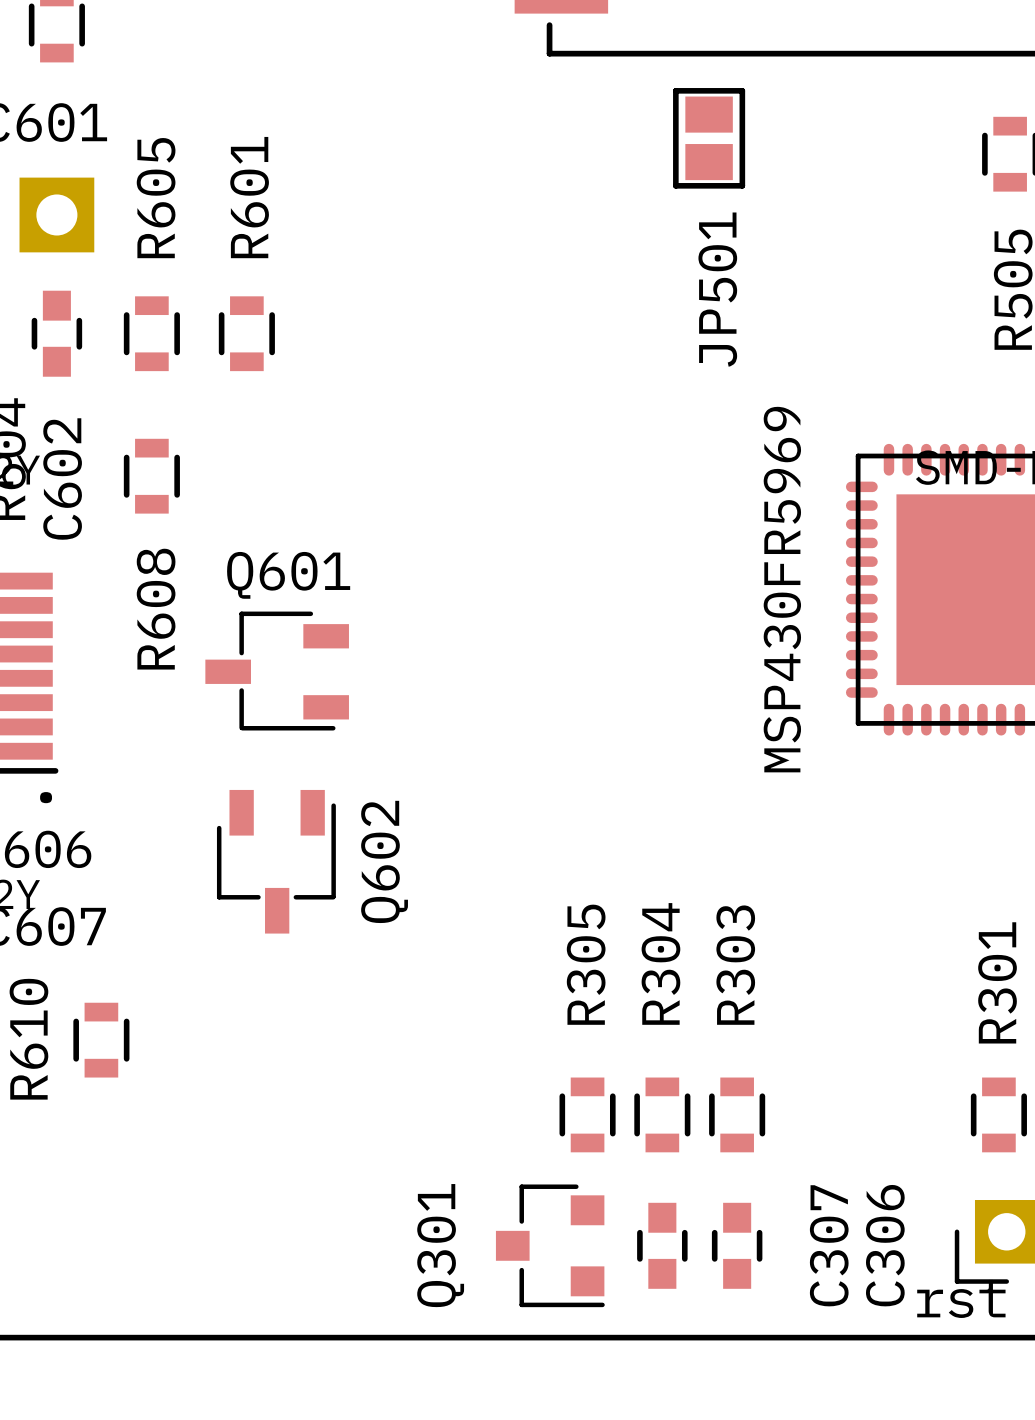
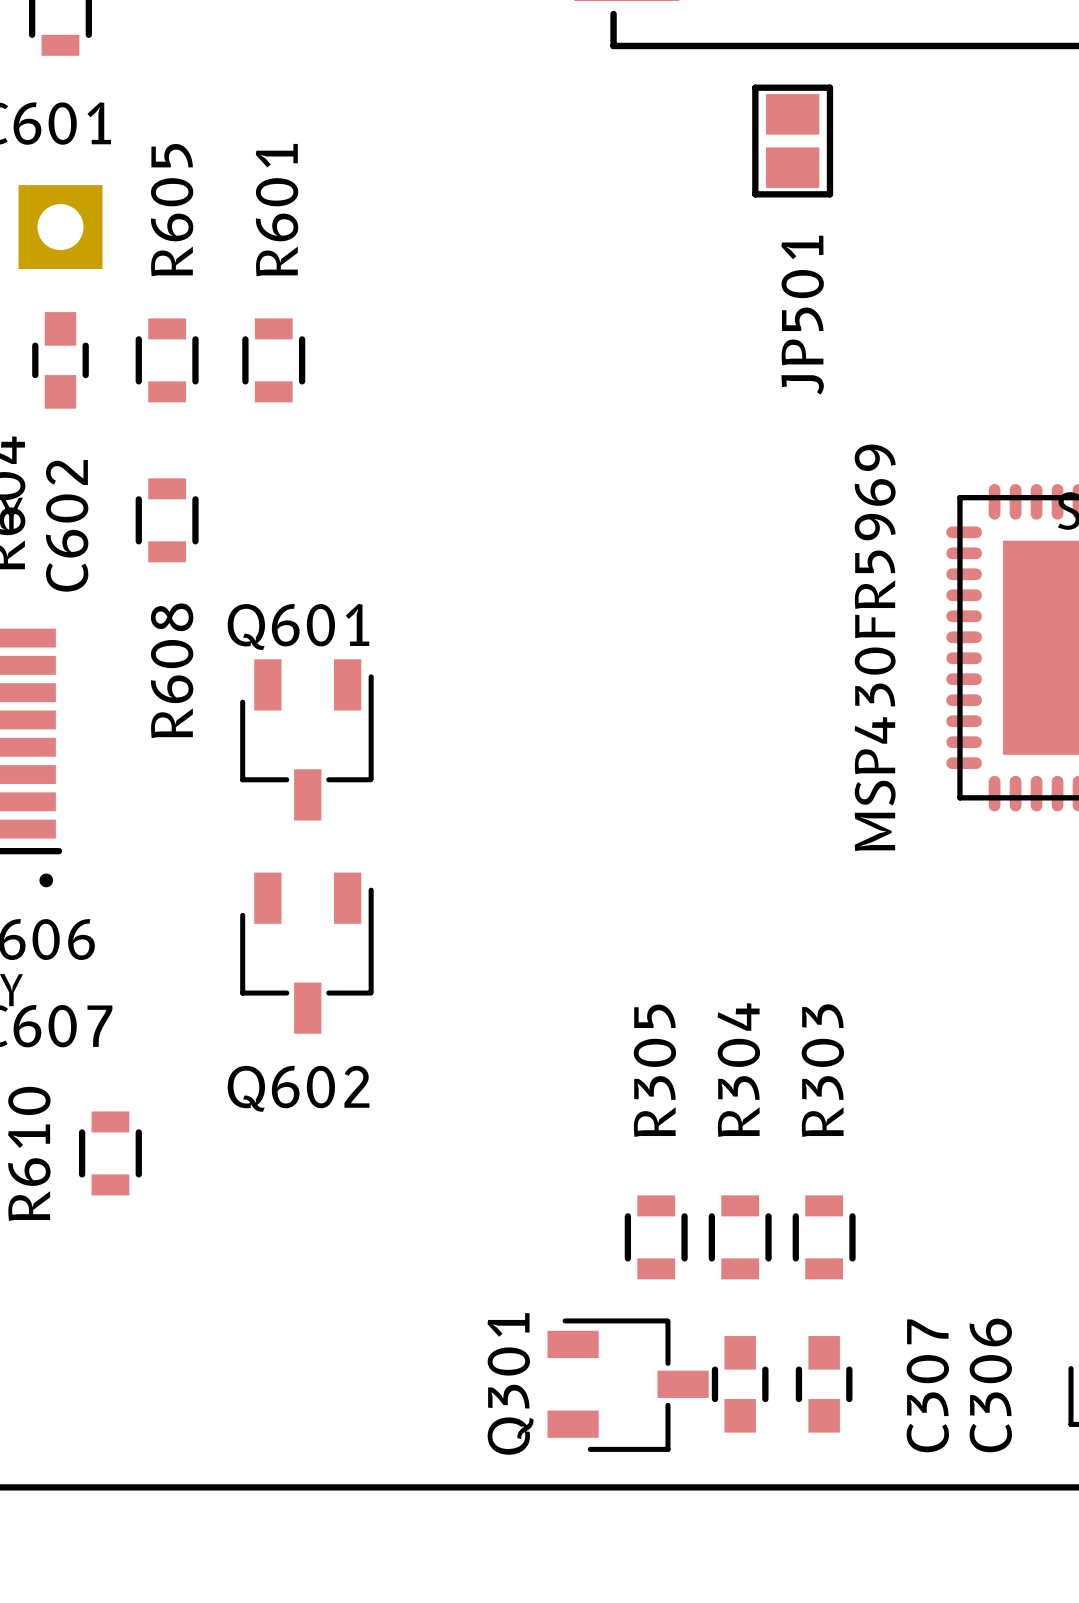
Q601 rotation: 0° (277, 671) -> 90° counterclockwise (306, 739)
Q602 name rotation: 0° (384, 861) -> 90° clockwise (298, 1088)
Q301 footprint: [495, 1184, 605, 1308] -> [547, 1318, 709, 1452]

